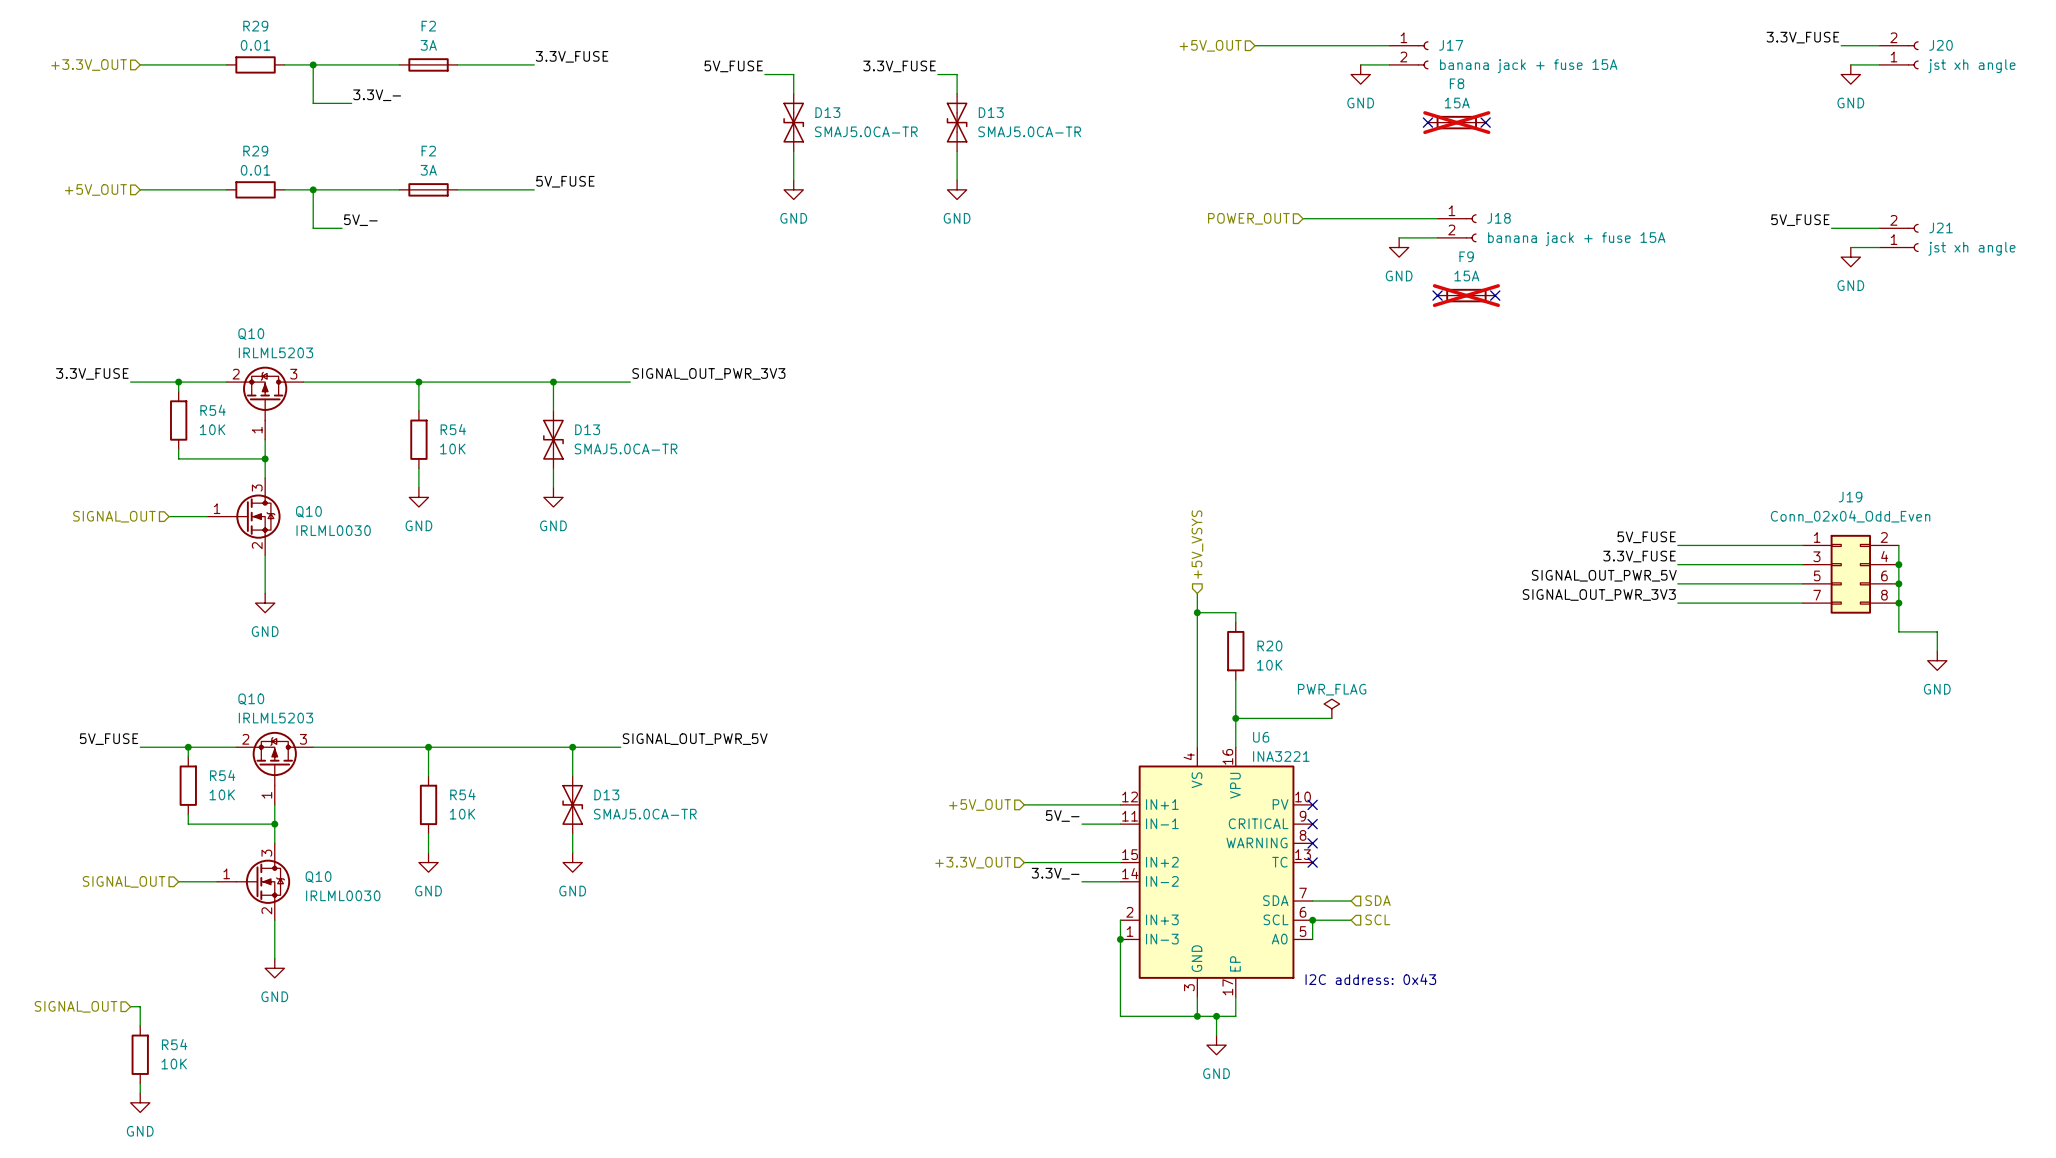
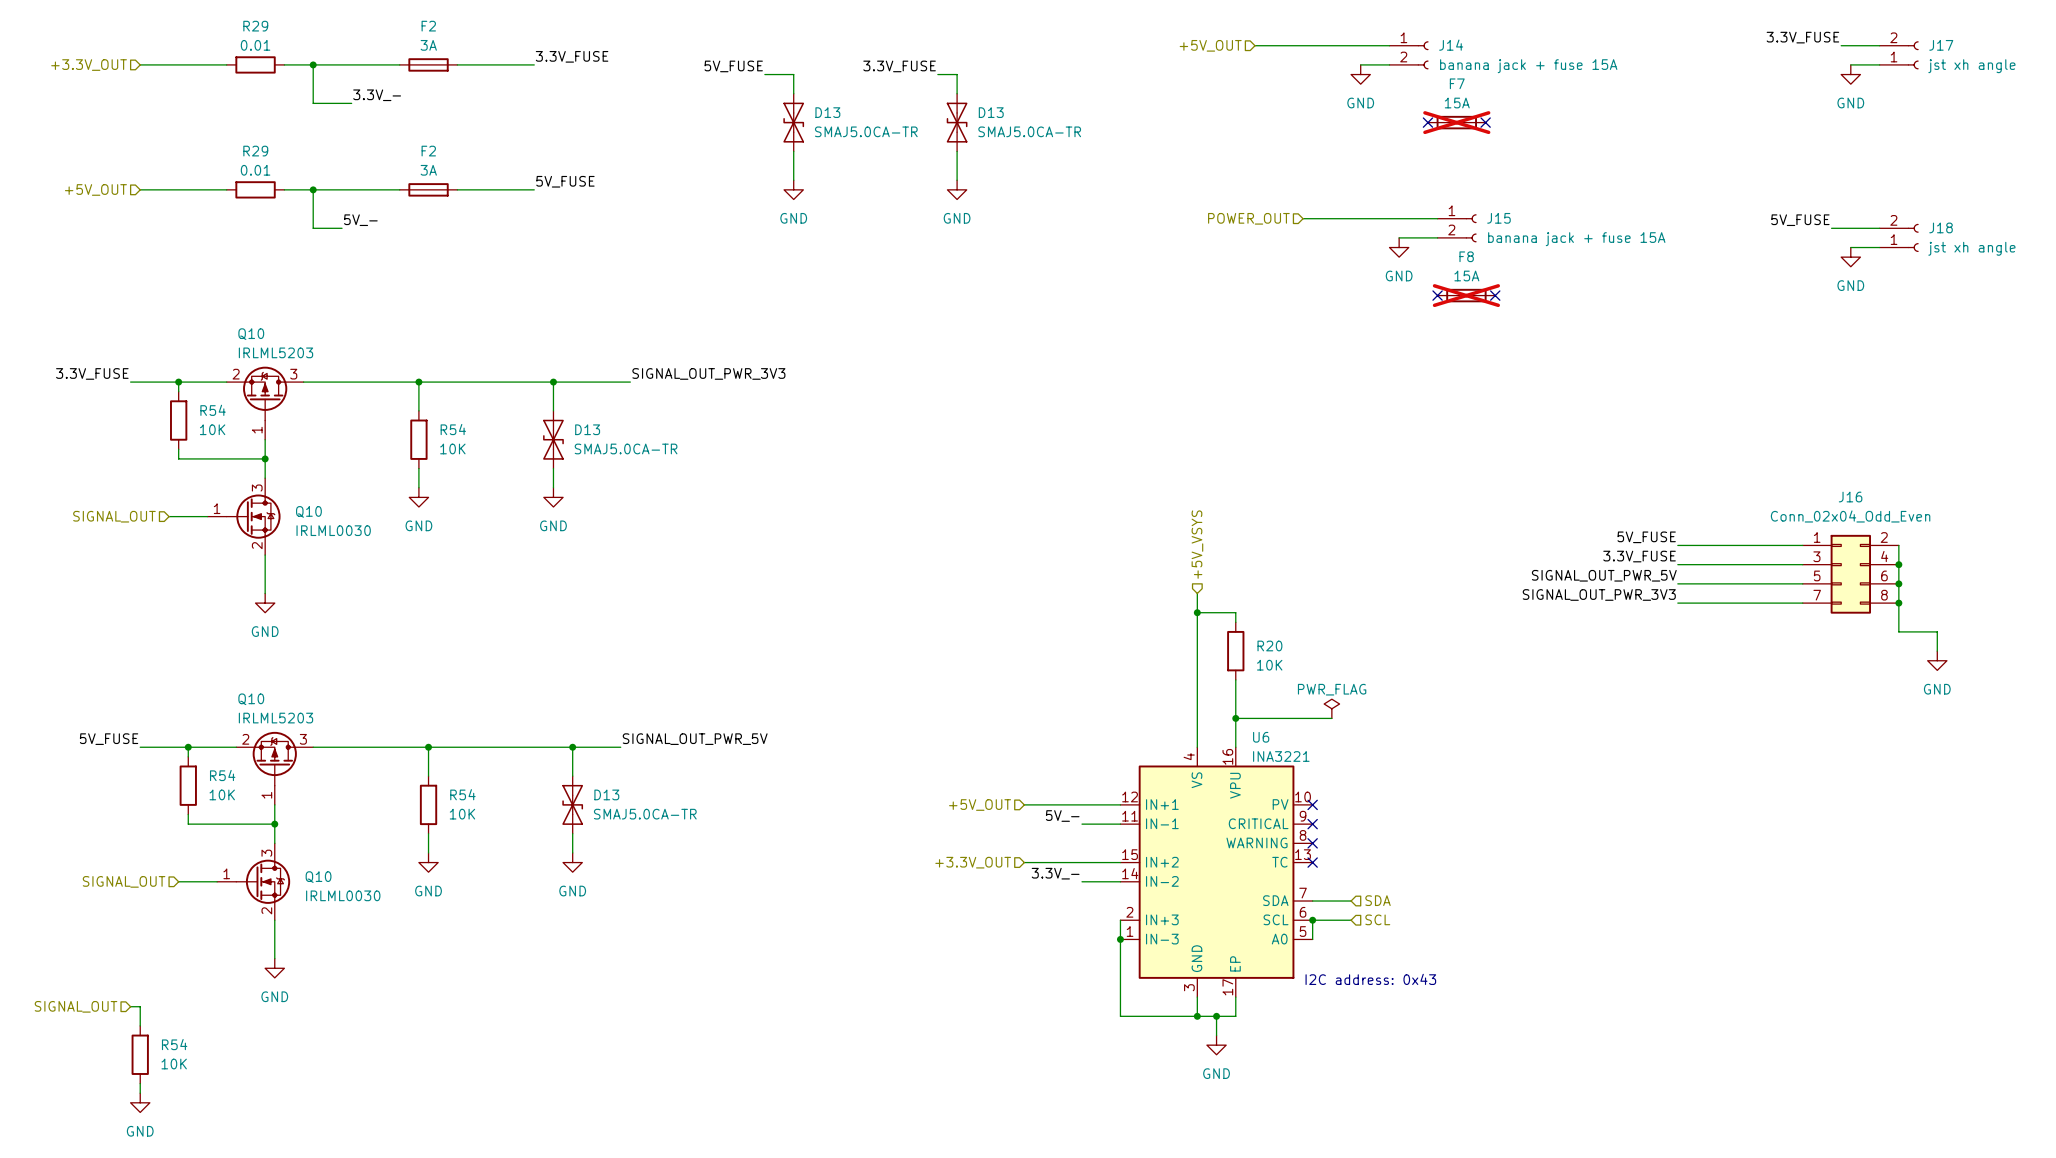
J17 name: J17 (1451, 45) -> J14 (1451, 45)
J20 name: J20 (1941, 45) -> J17 (1941, 45)
F8 name: F8 (1457, 83) -> F7 (1457, 83)
J18 name: J18 (1498, 218) -> J15 (1498, 218)
J21 name: J21 (1941, 227) -> J18 (1941, 227)
F9 name: F9 (1466, 256) -> F8 (1466, 256)
J19 name: J19 (1850, 497) -> J16 (1850, 497)

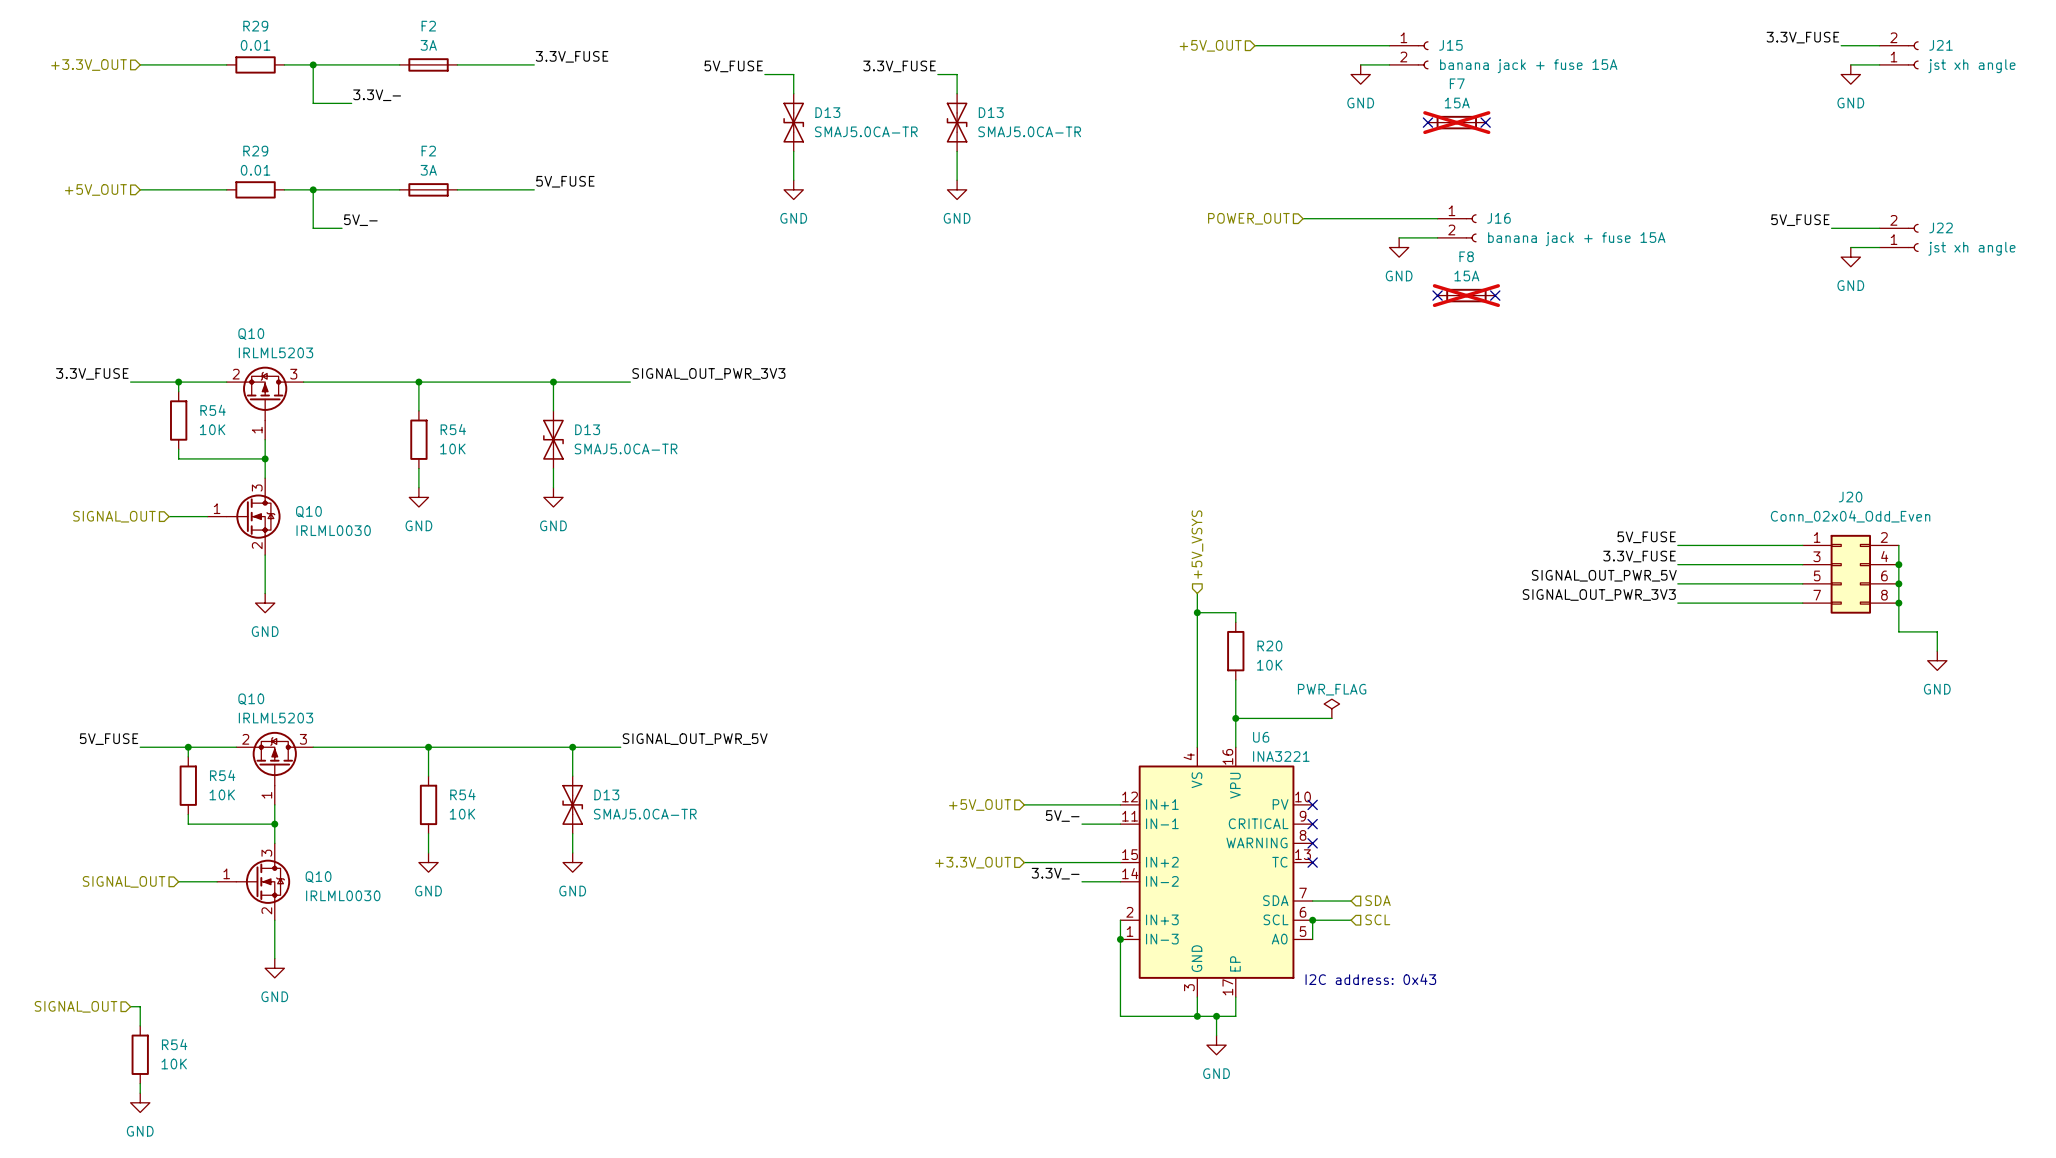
J14 name: J14 (1451, 45) -> J15 (1450, 45)
J17 name: J17 (1941, 45) -> J21 (1941, 45)
J15 name: J15 (1498, 218) -> J16 (1498, 218)
J18 name: J18 (1941, 227) -> J22 (1941, 227)
J16 name: J16 (1850, 497) -> J20 (1850, 497)

